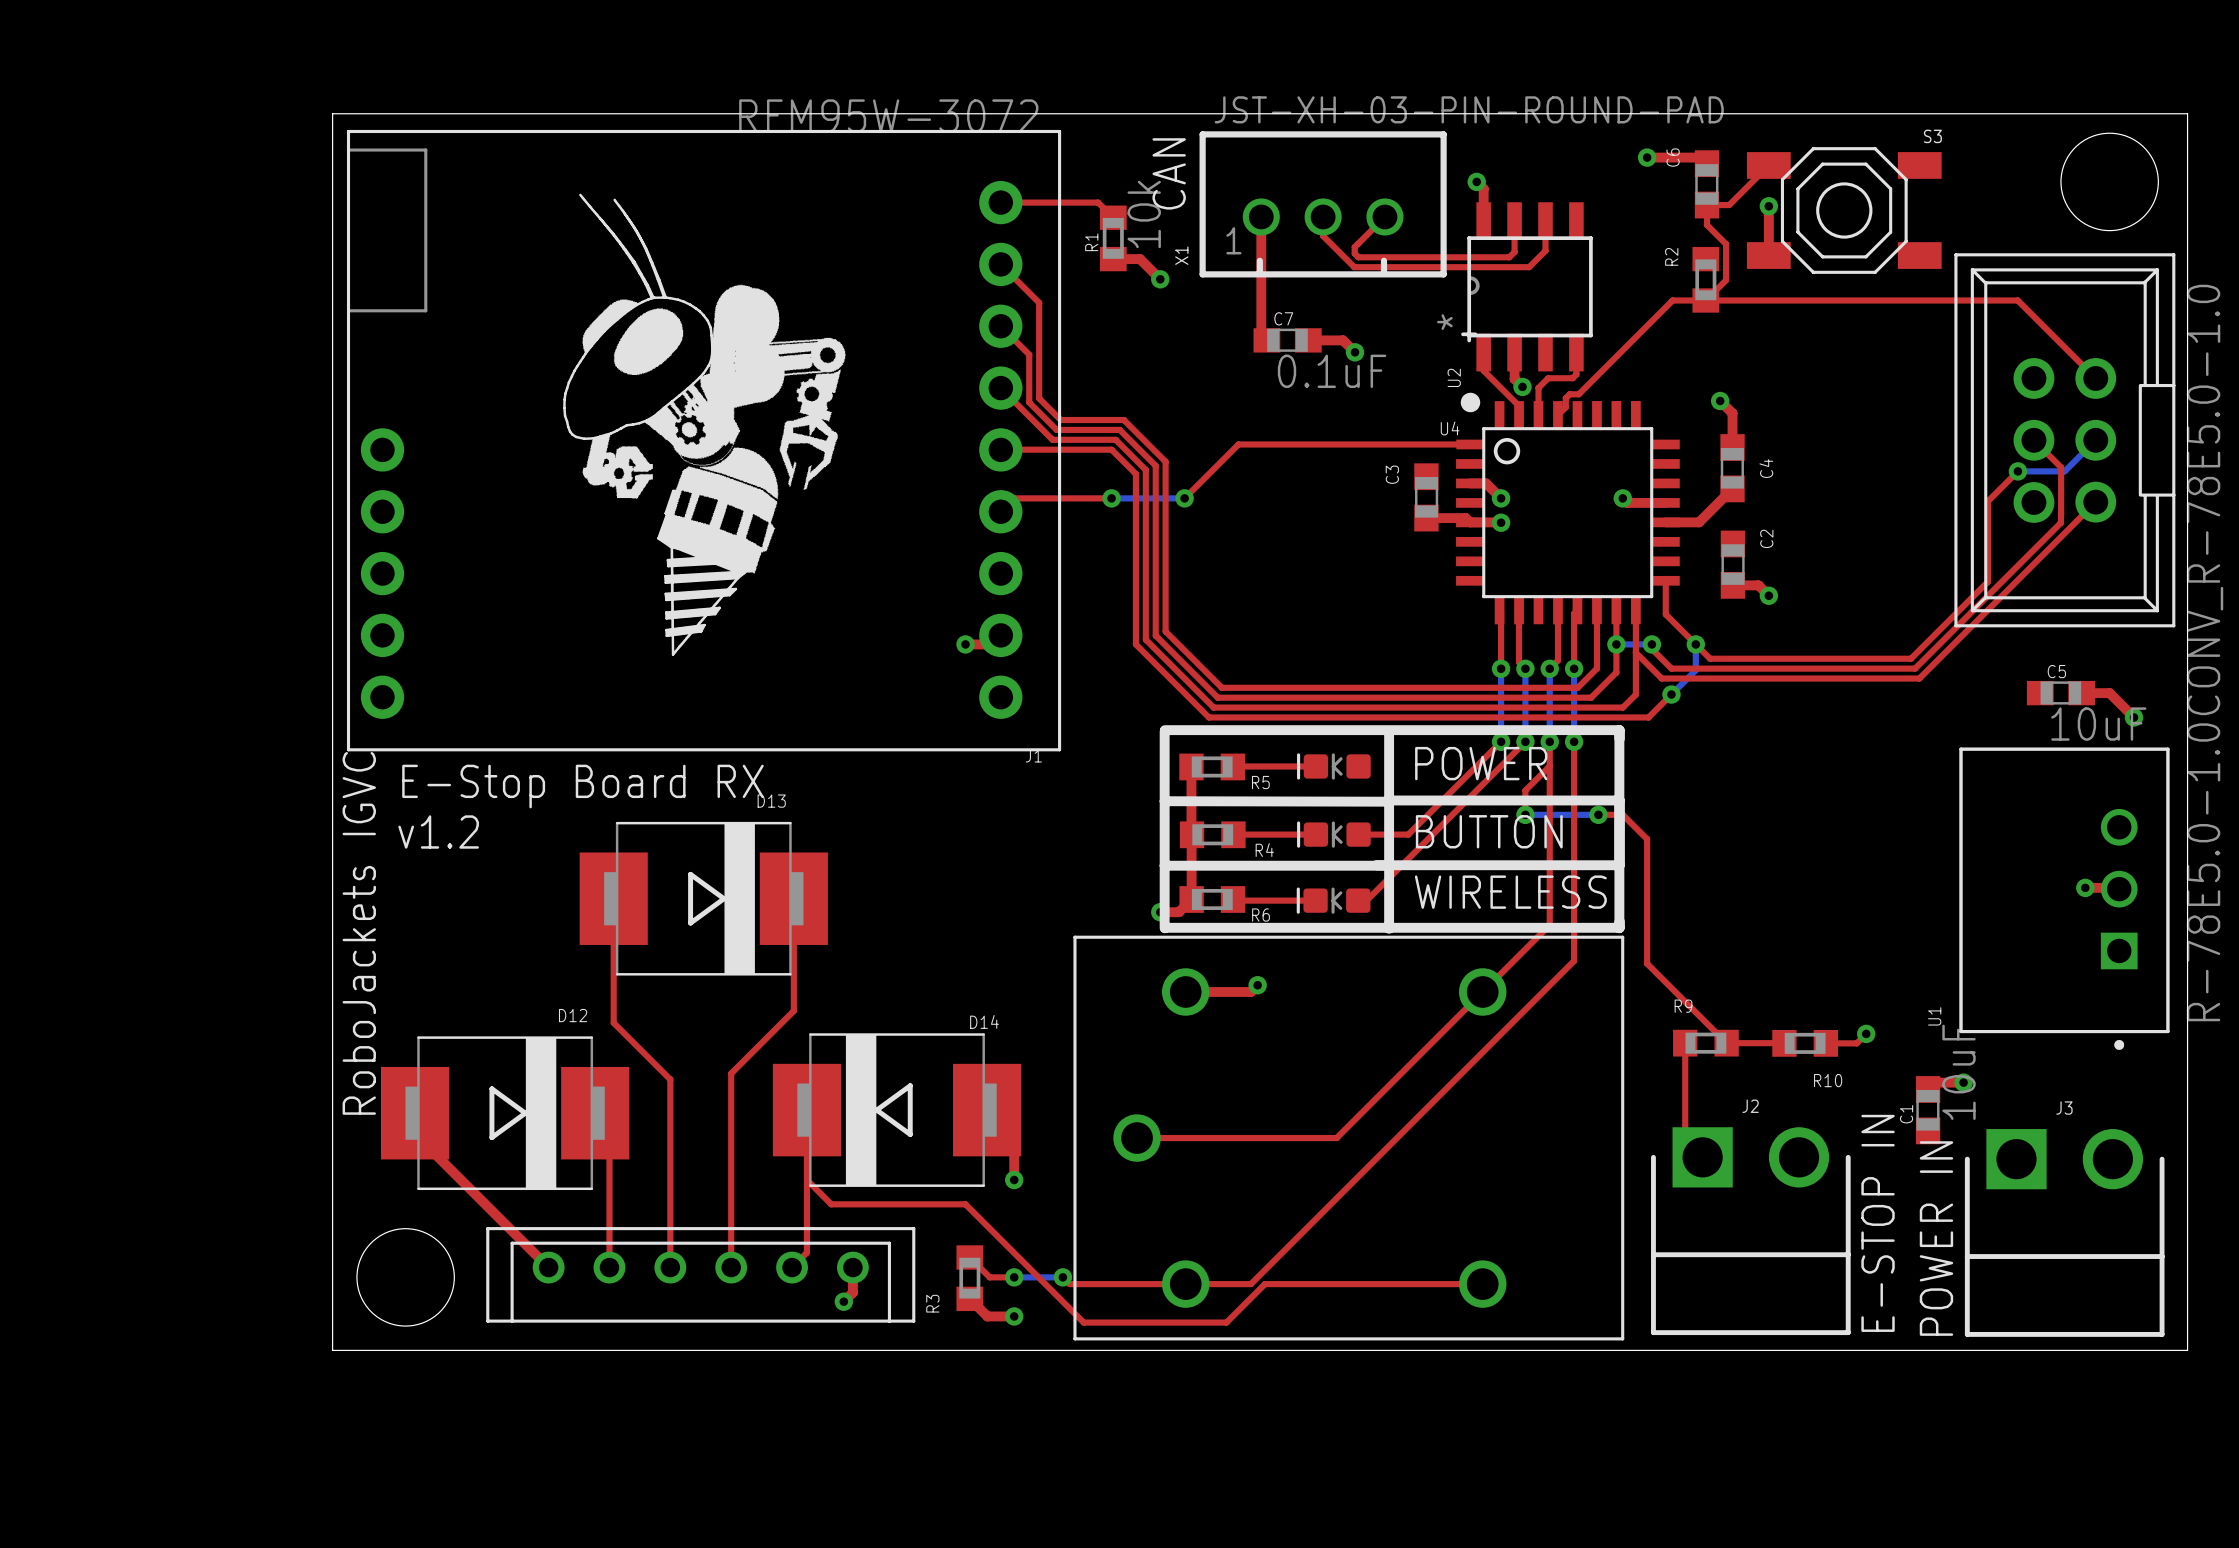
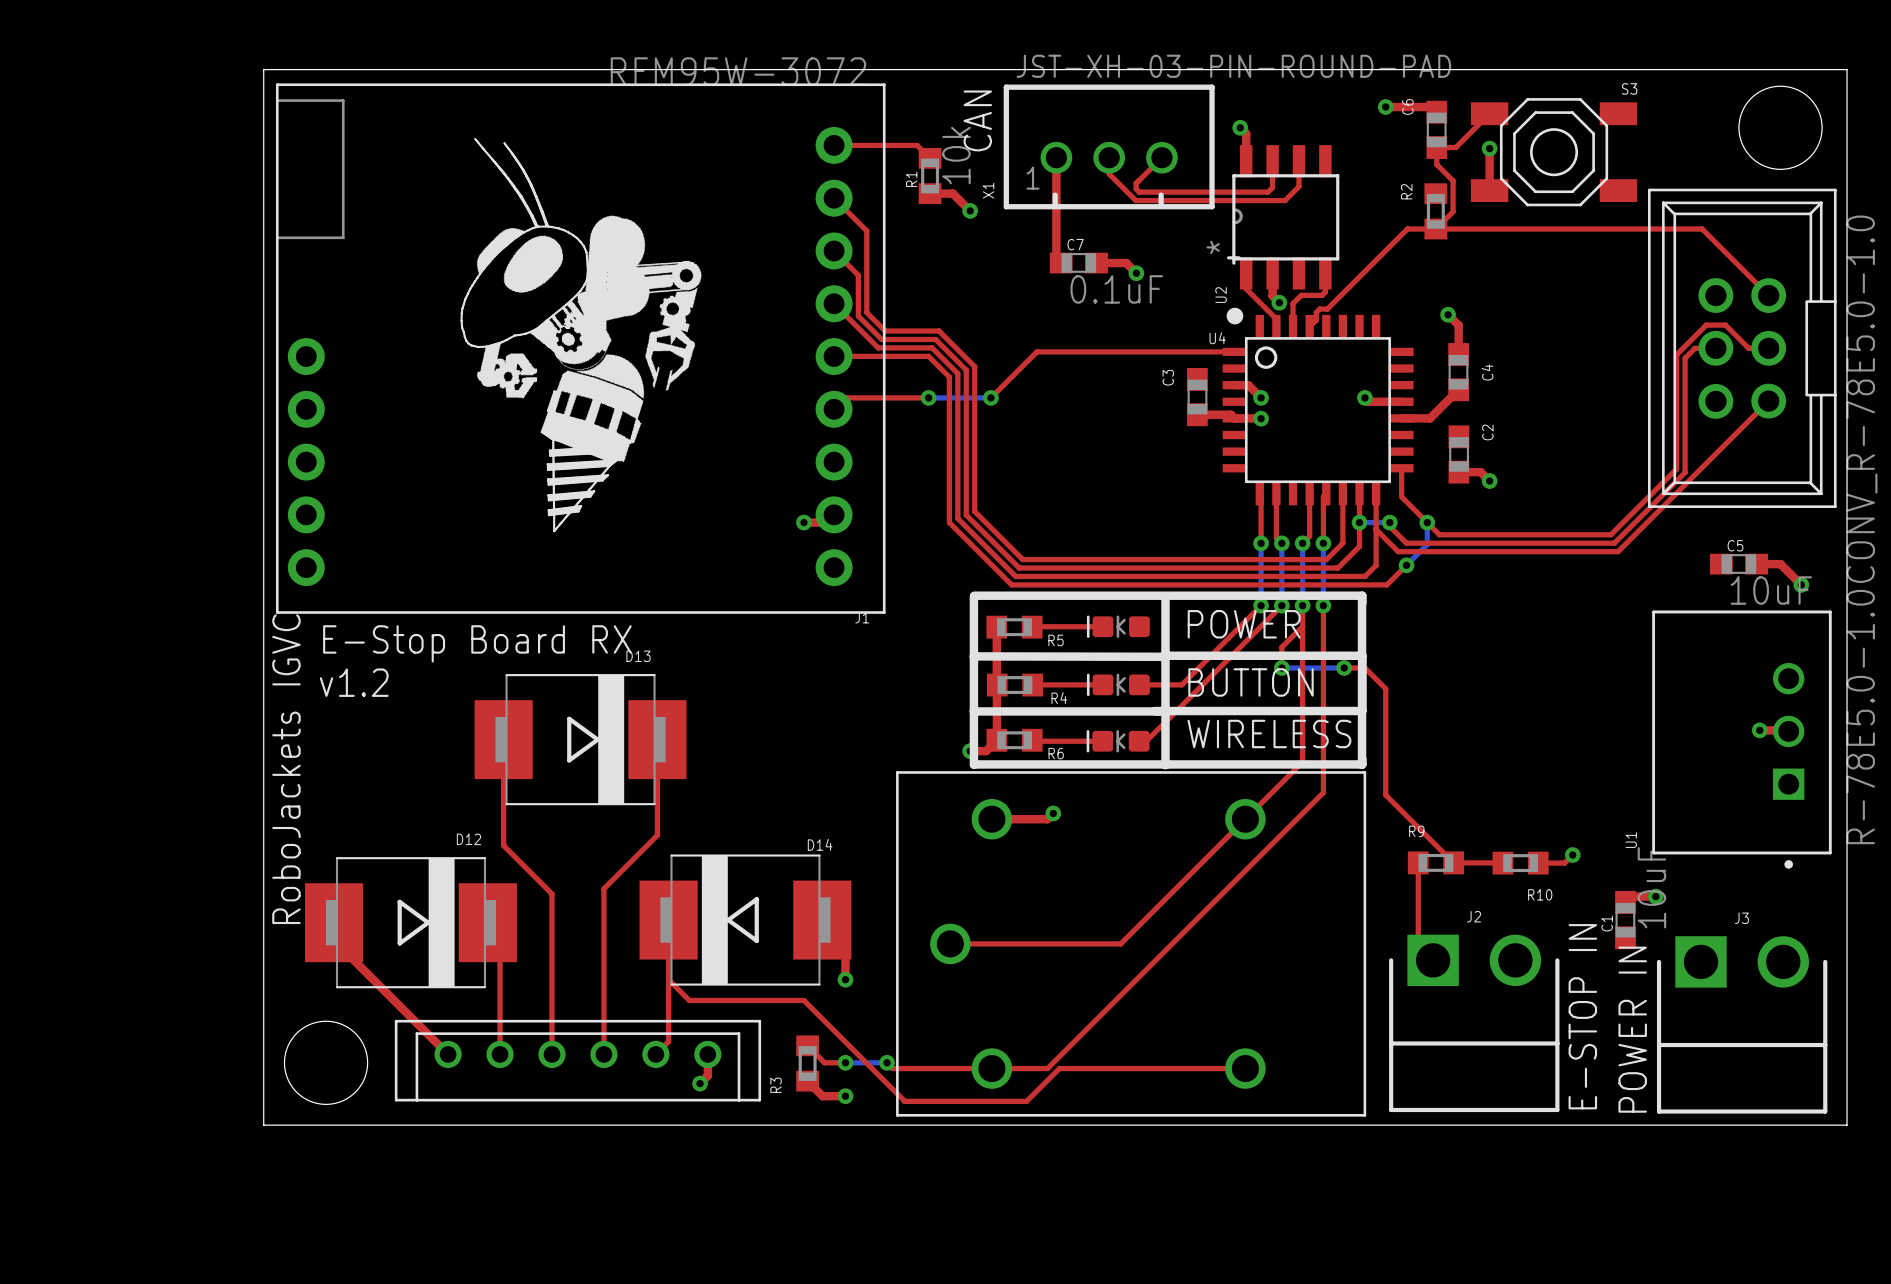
top track: (2033, 440) (2061, 467) (2061, 513) -> none
bottom track: (2095, 440) (2064, 471) (2017, 471) -> none
top track: (2017, 471) (1987, 501) -> (1768, 348) (1748, 348) (1725, 325) (1706, 325) (1676, 354) (1676, 400)
via: (2017, 471) -> none
top track: (2060, 513) (2060, 522) (1997, 585) -> (1715, 348) (1695, 348) (1685, 358) (1685, 472)

